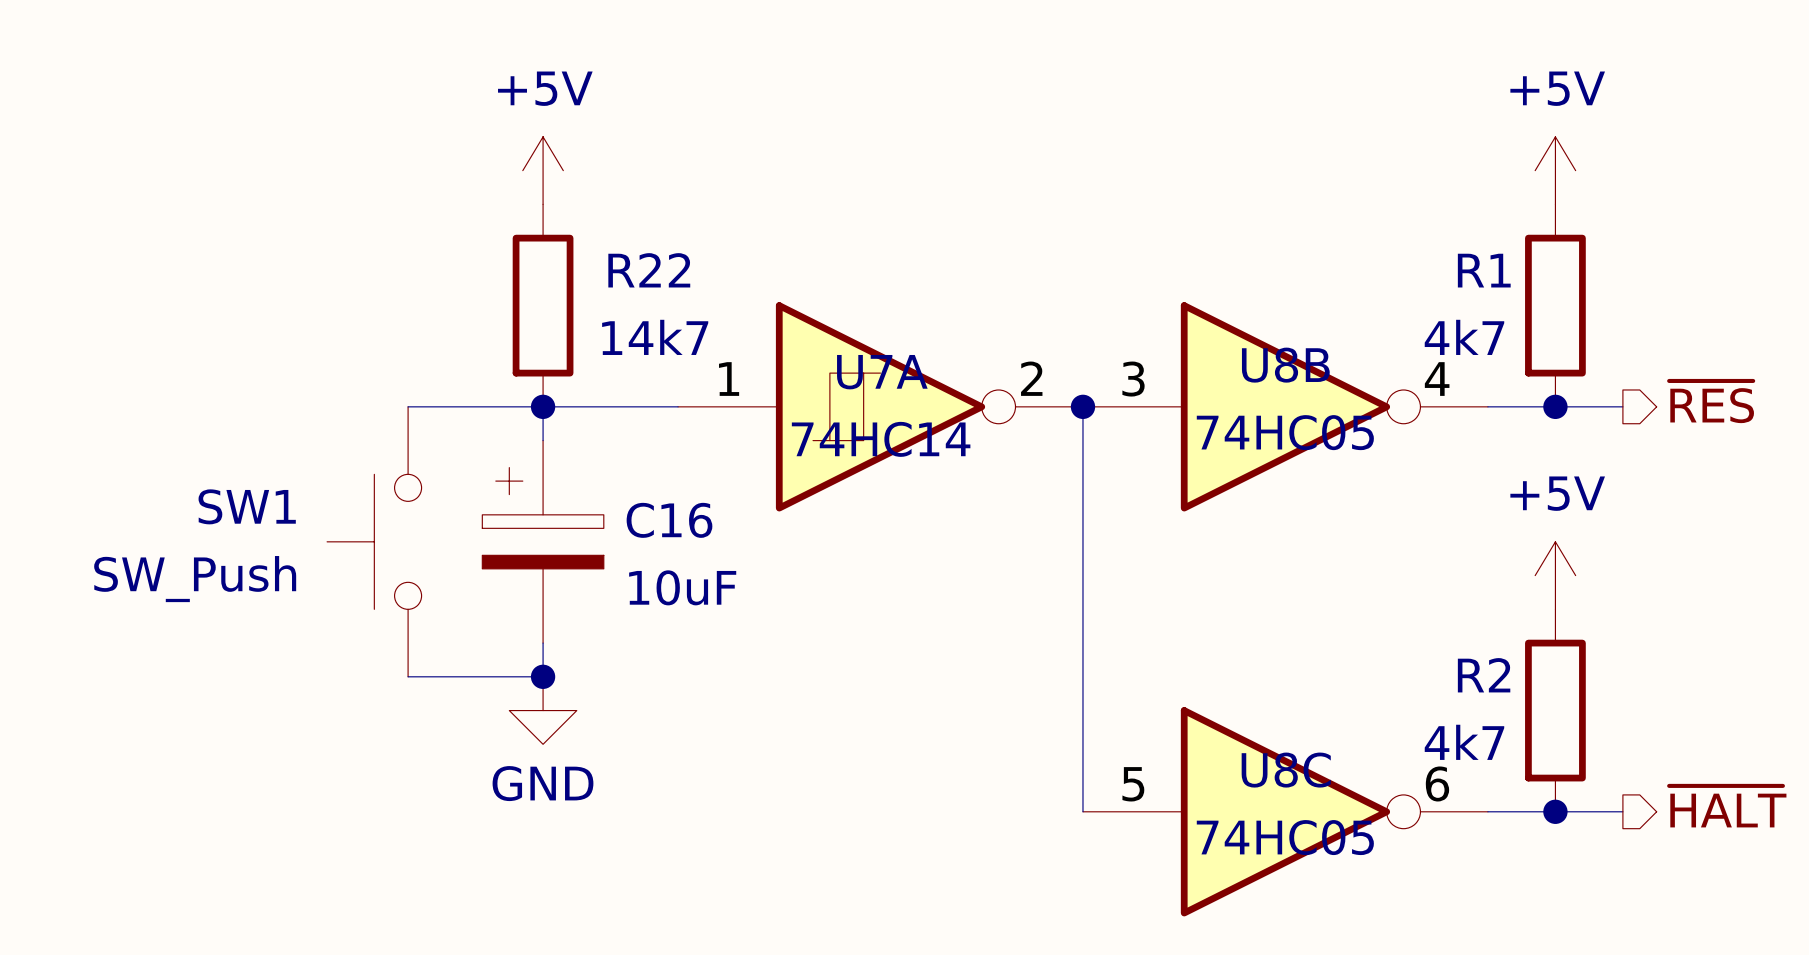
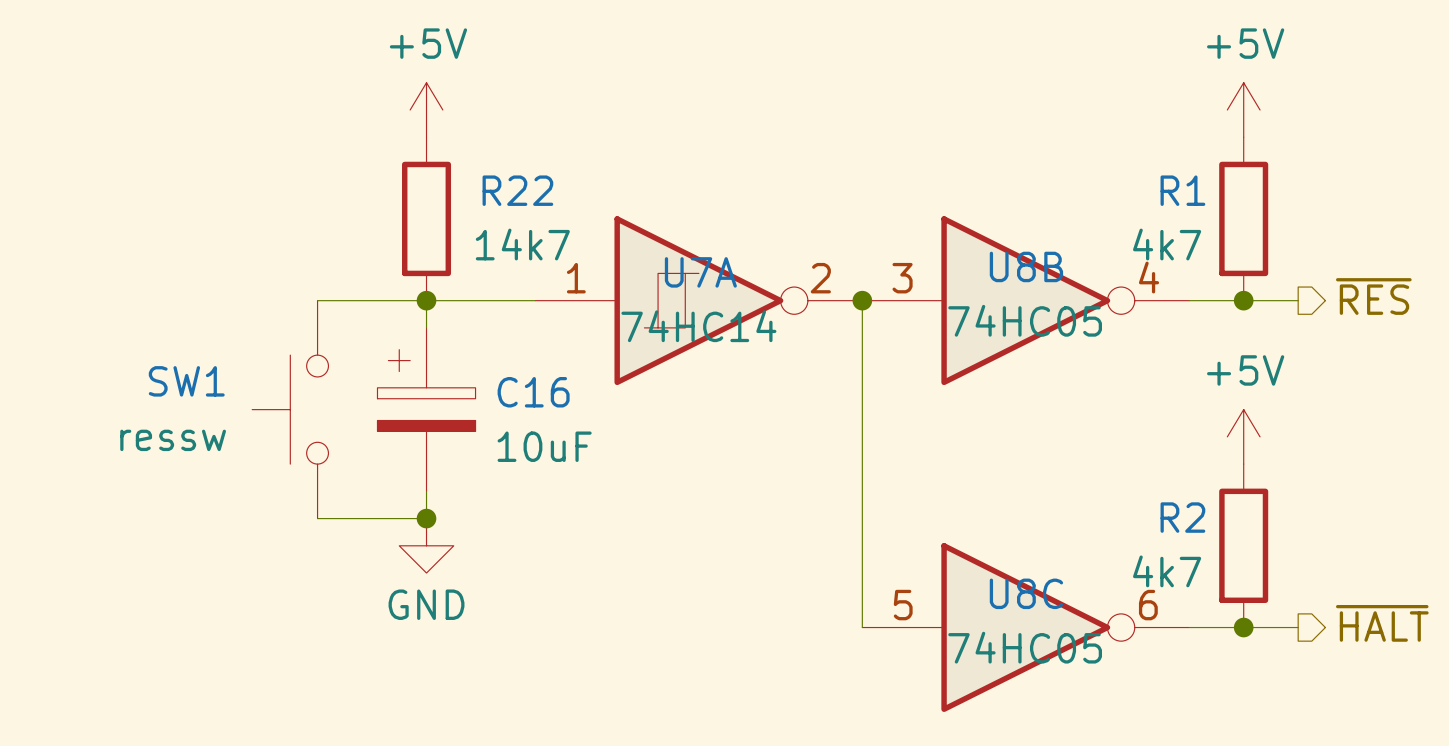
SW1 value: SW_Push (195, 579) -> ressw (173, 440)

